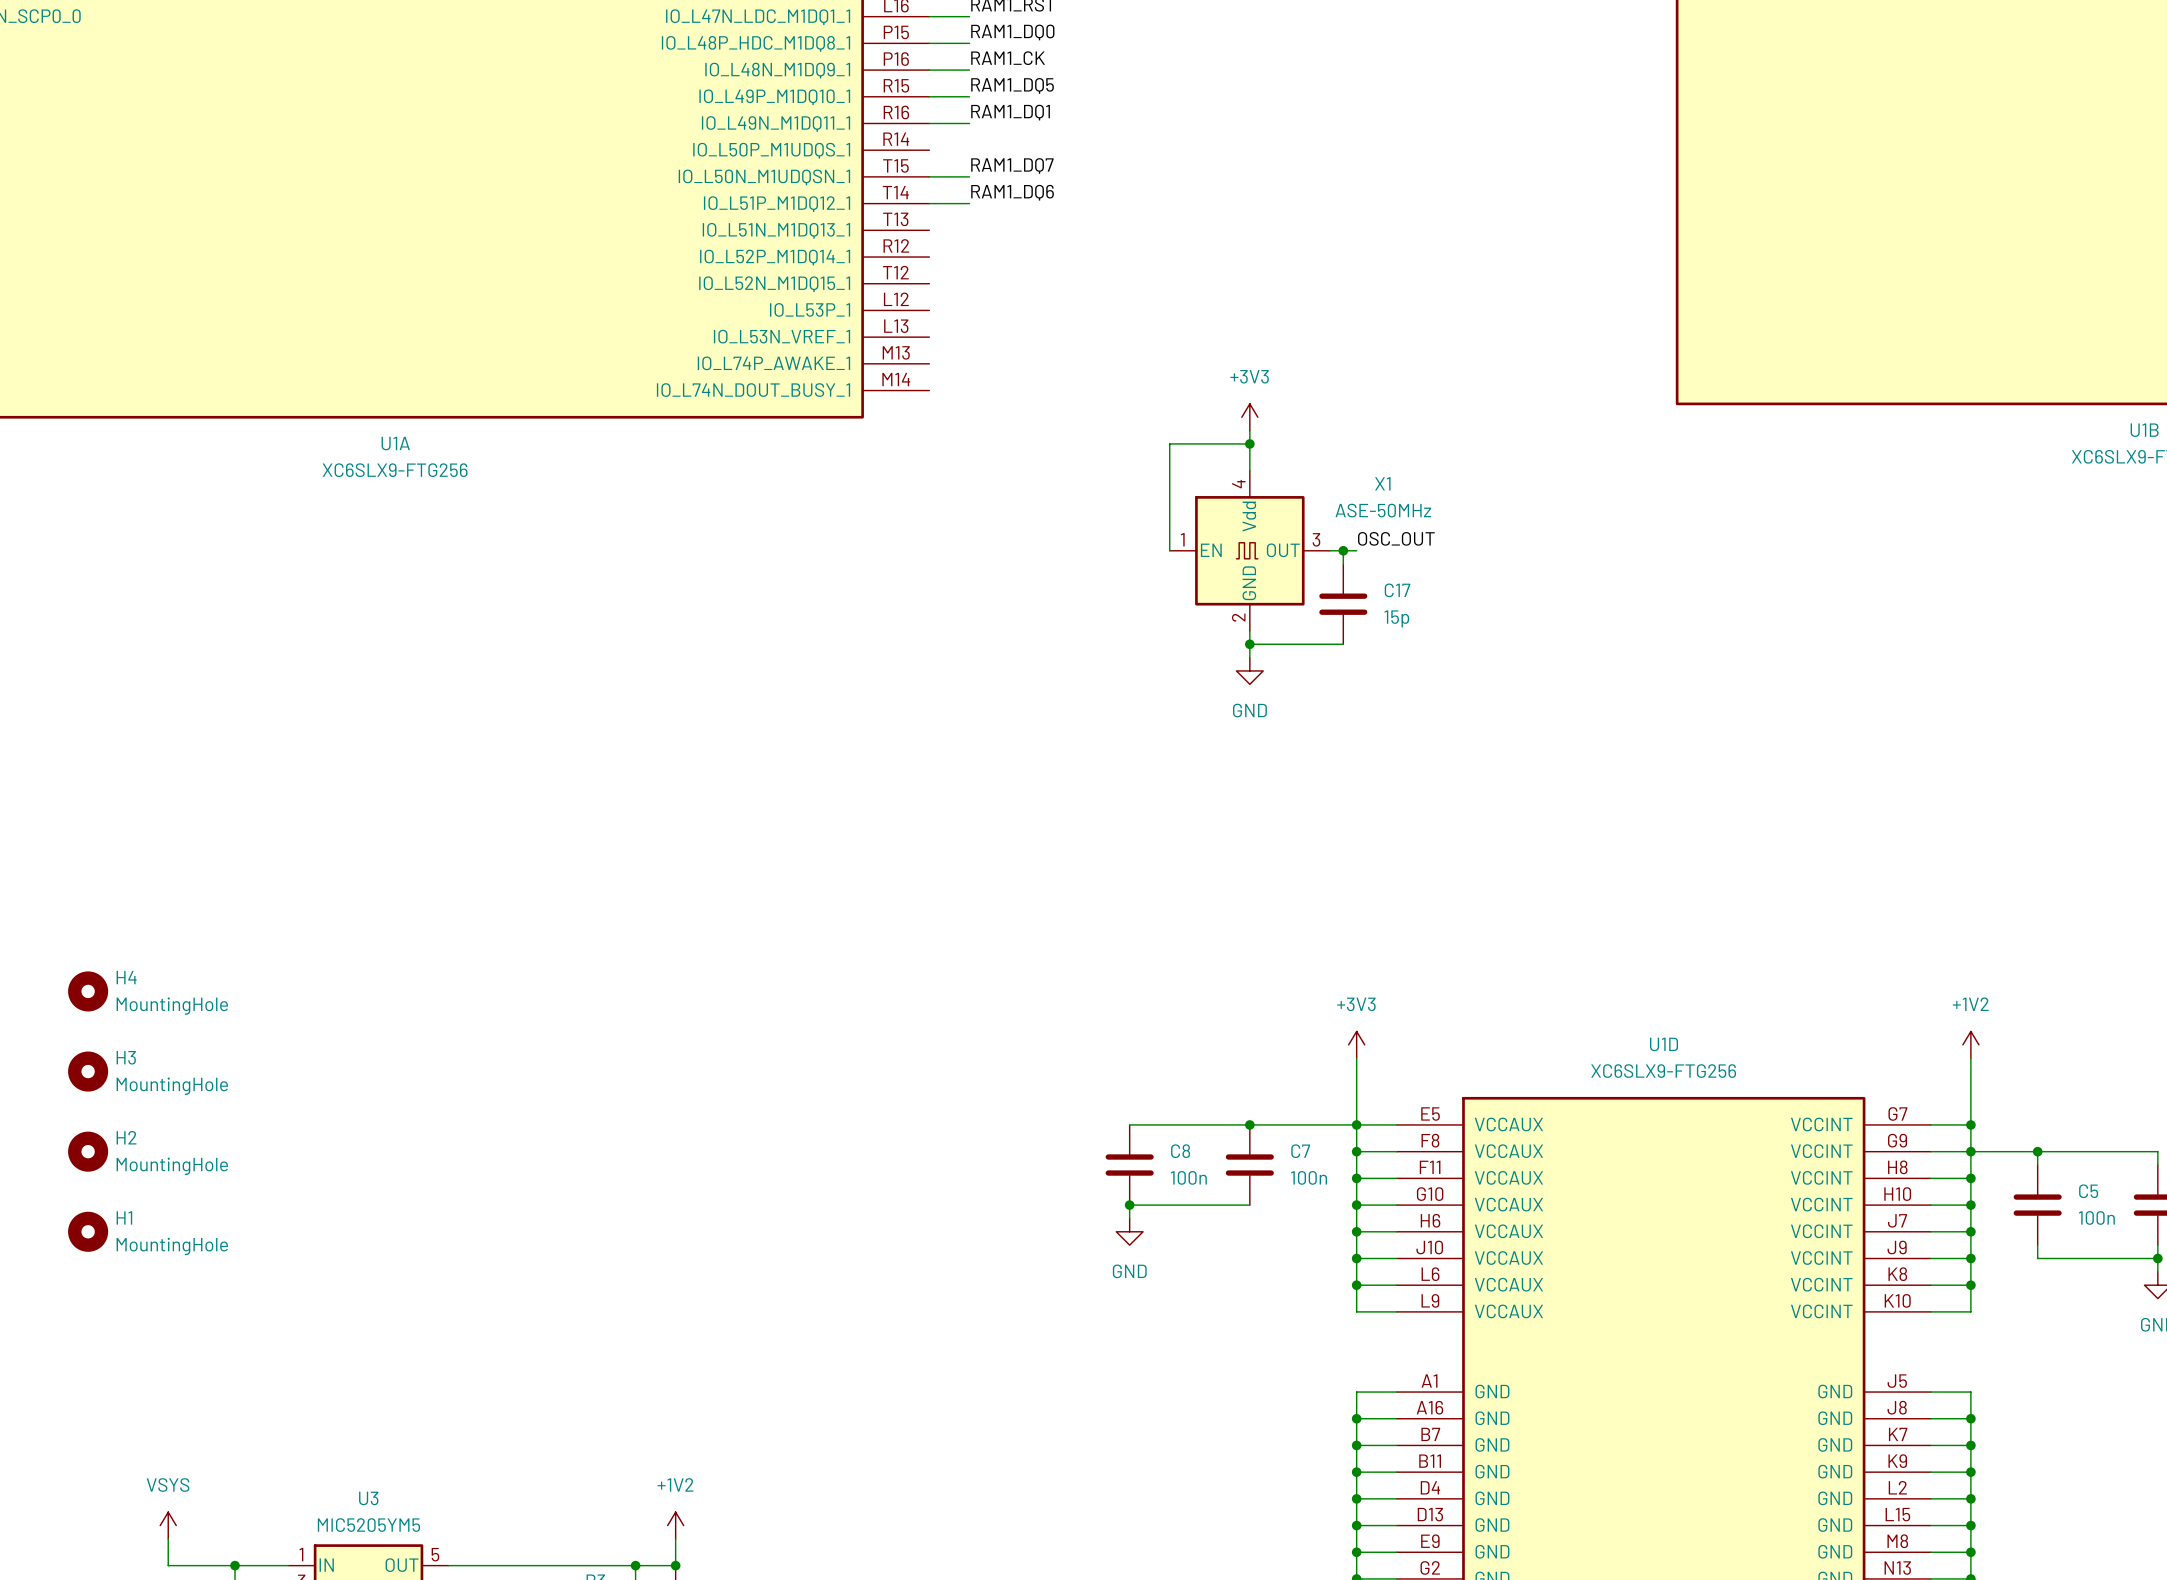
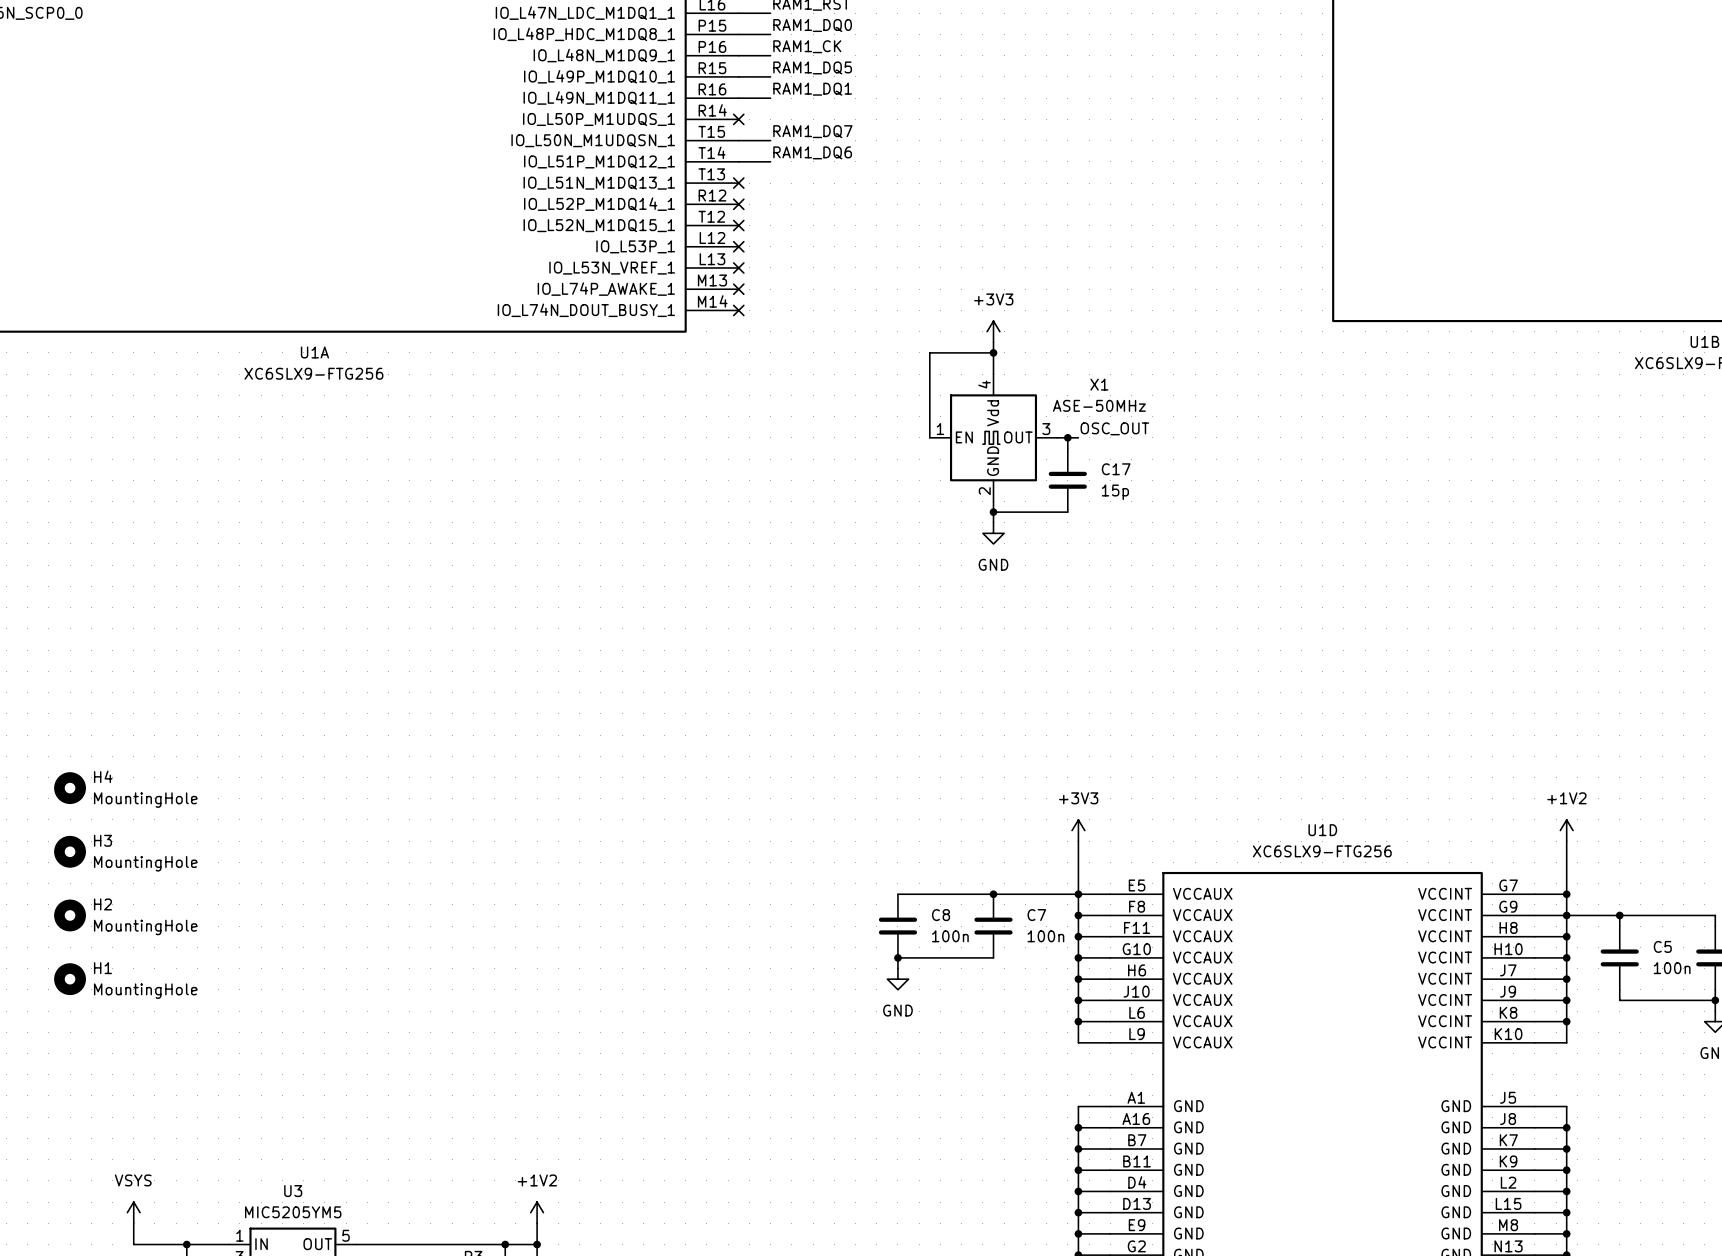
no-connect mark: none -> (738, 119)
no-connect mark: none -> (738, 183)
no-connect mark: none -> (738, 204)
no-connect mark: none -> (738, 225)
no-connect mark: none -> (738, 246)
no-connect mark: none -> (738, 267)
no-connect mark: none -> (738, 289)
no-connect mark: none -> (738, 310)

